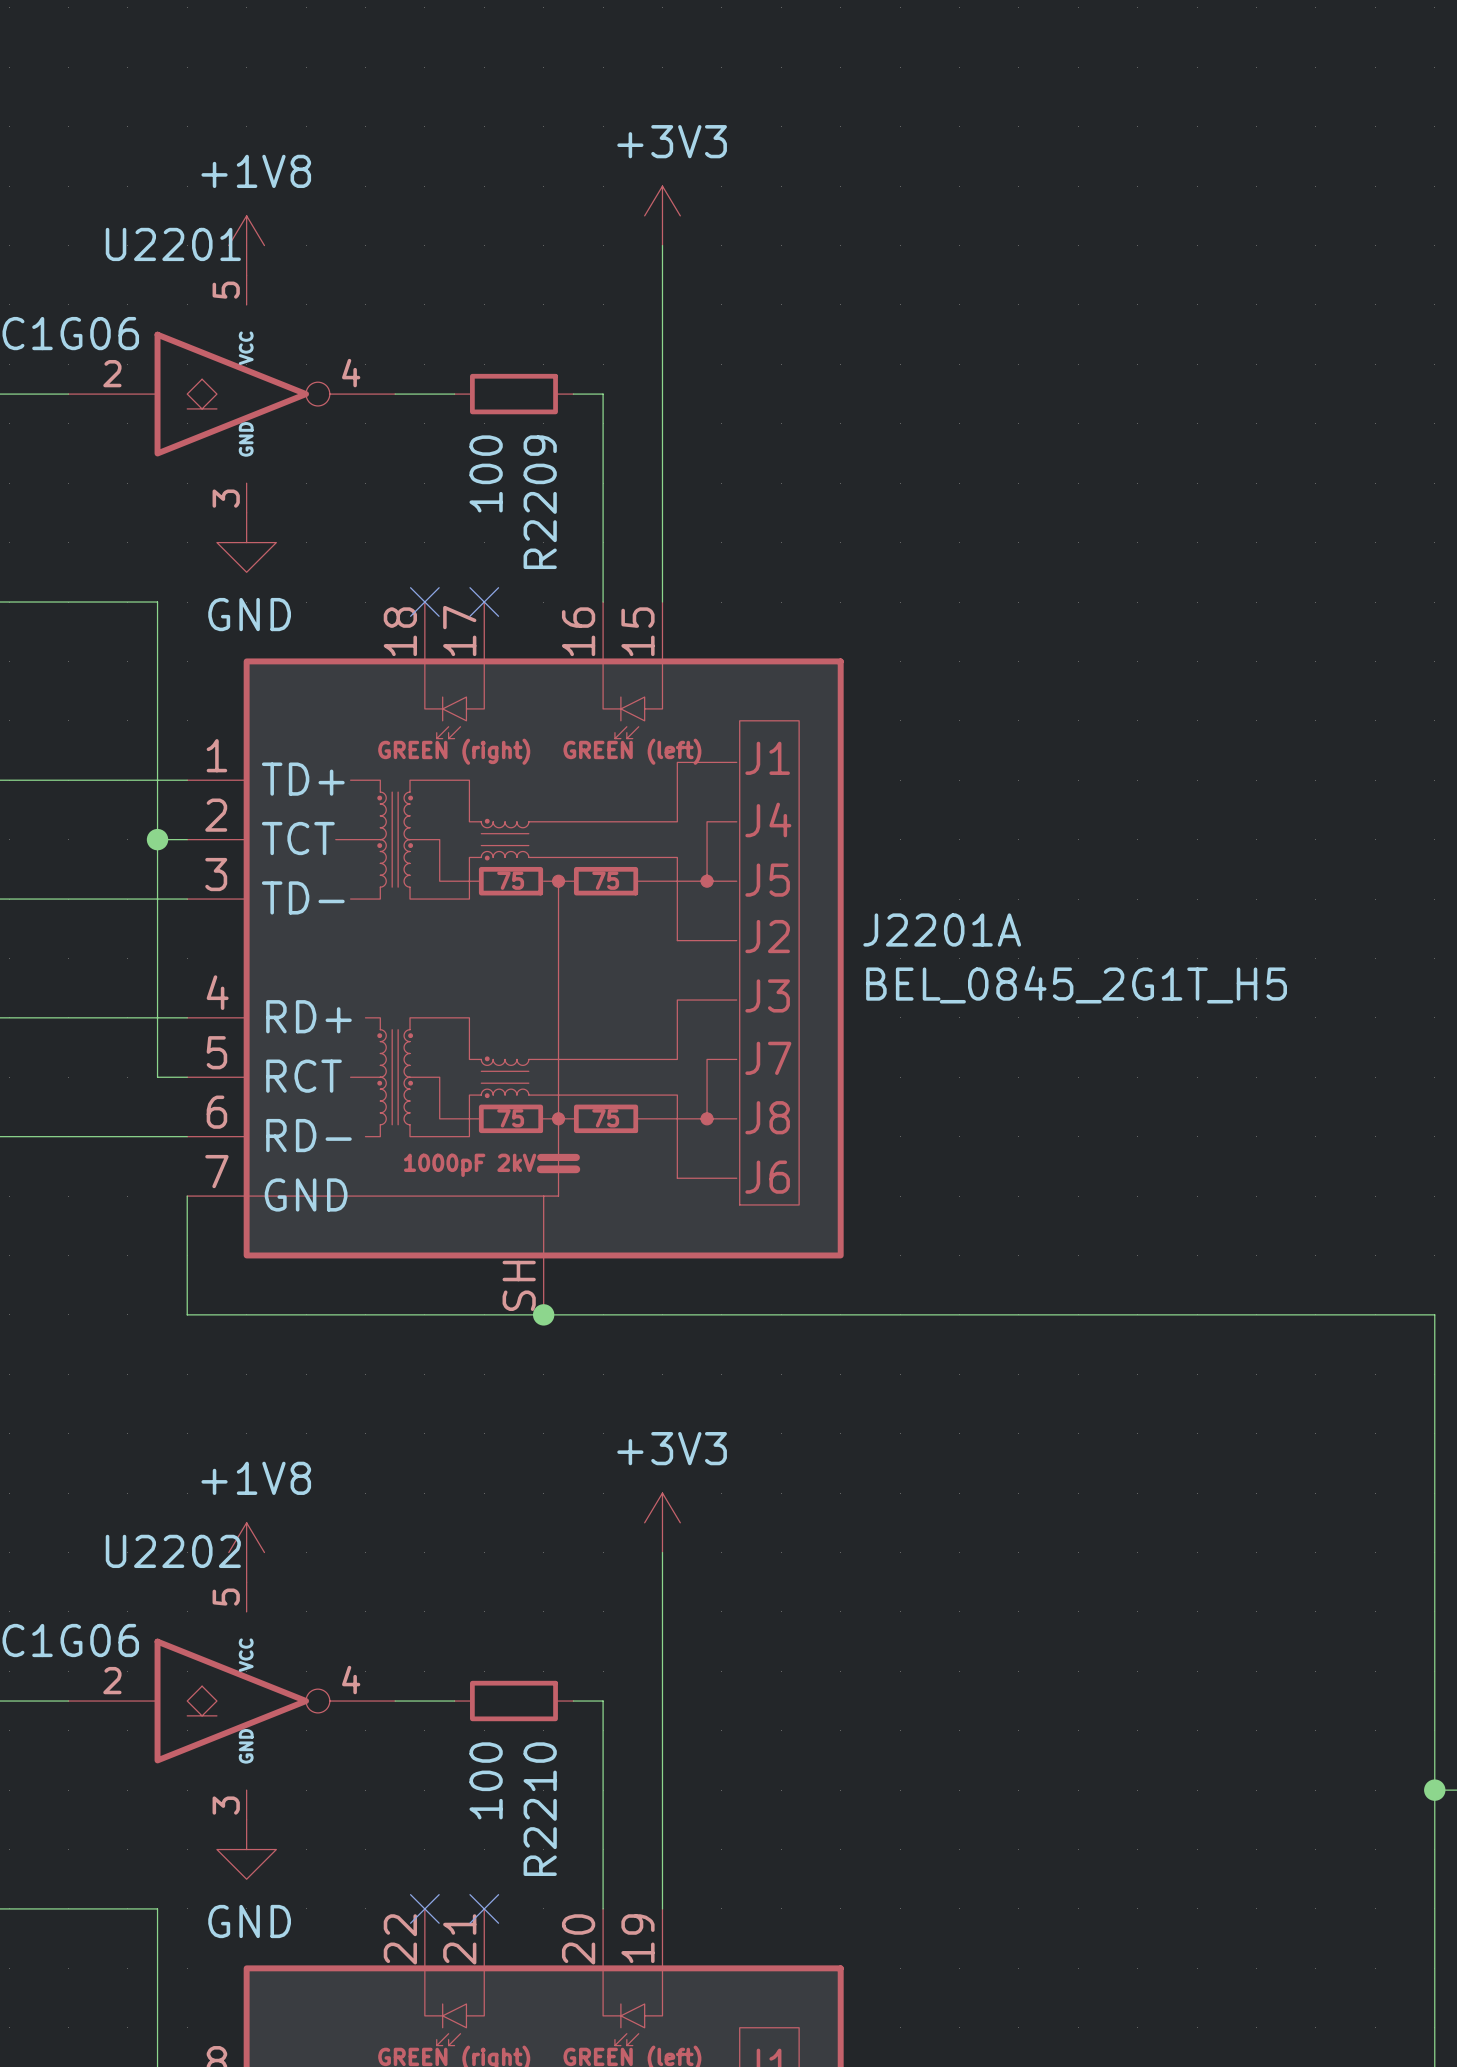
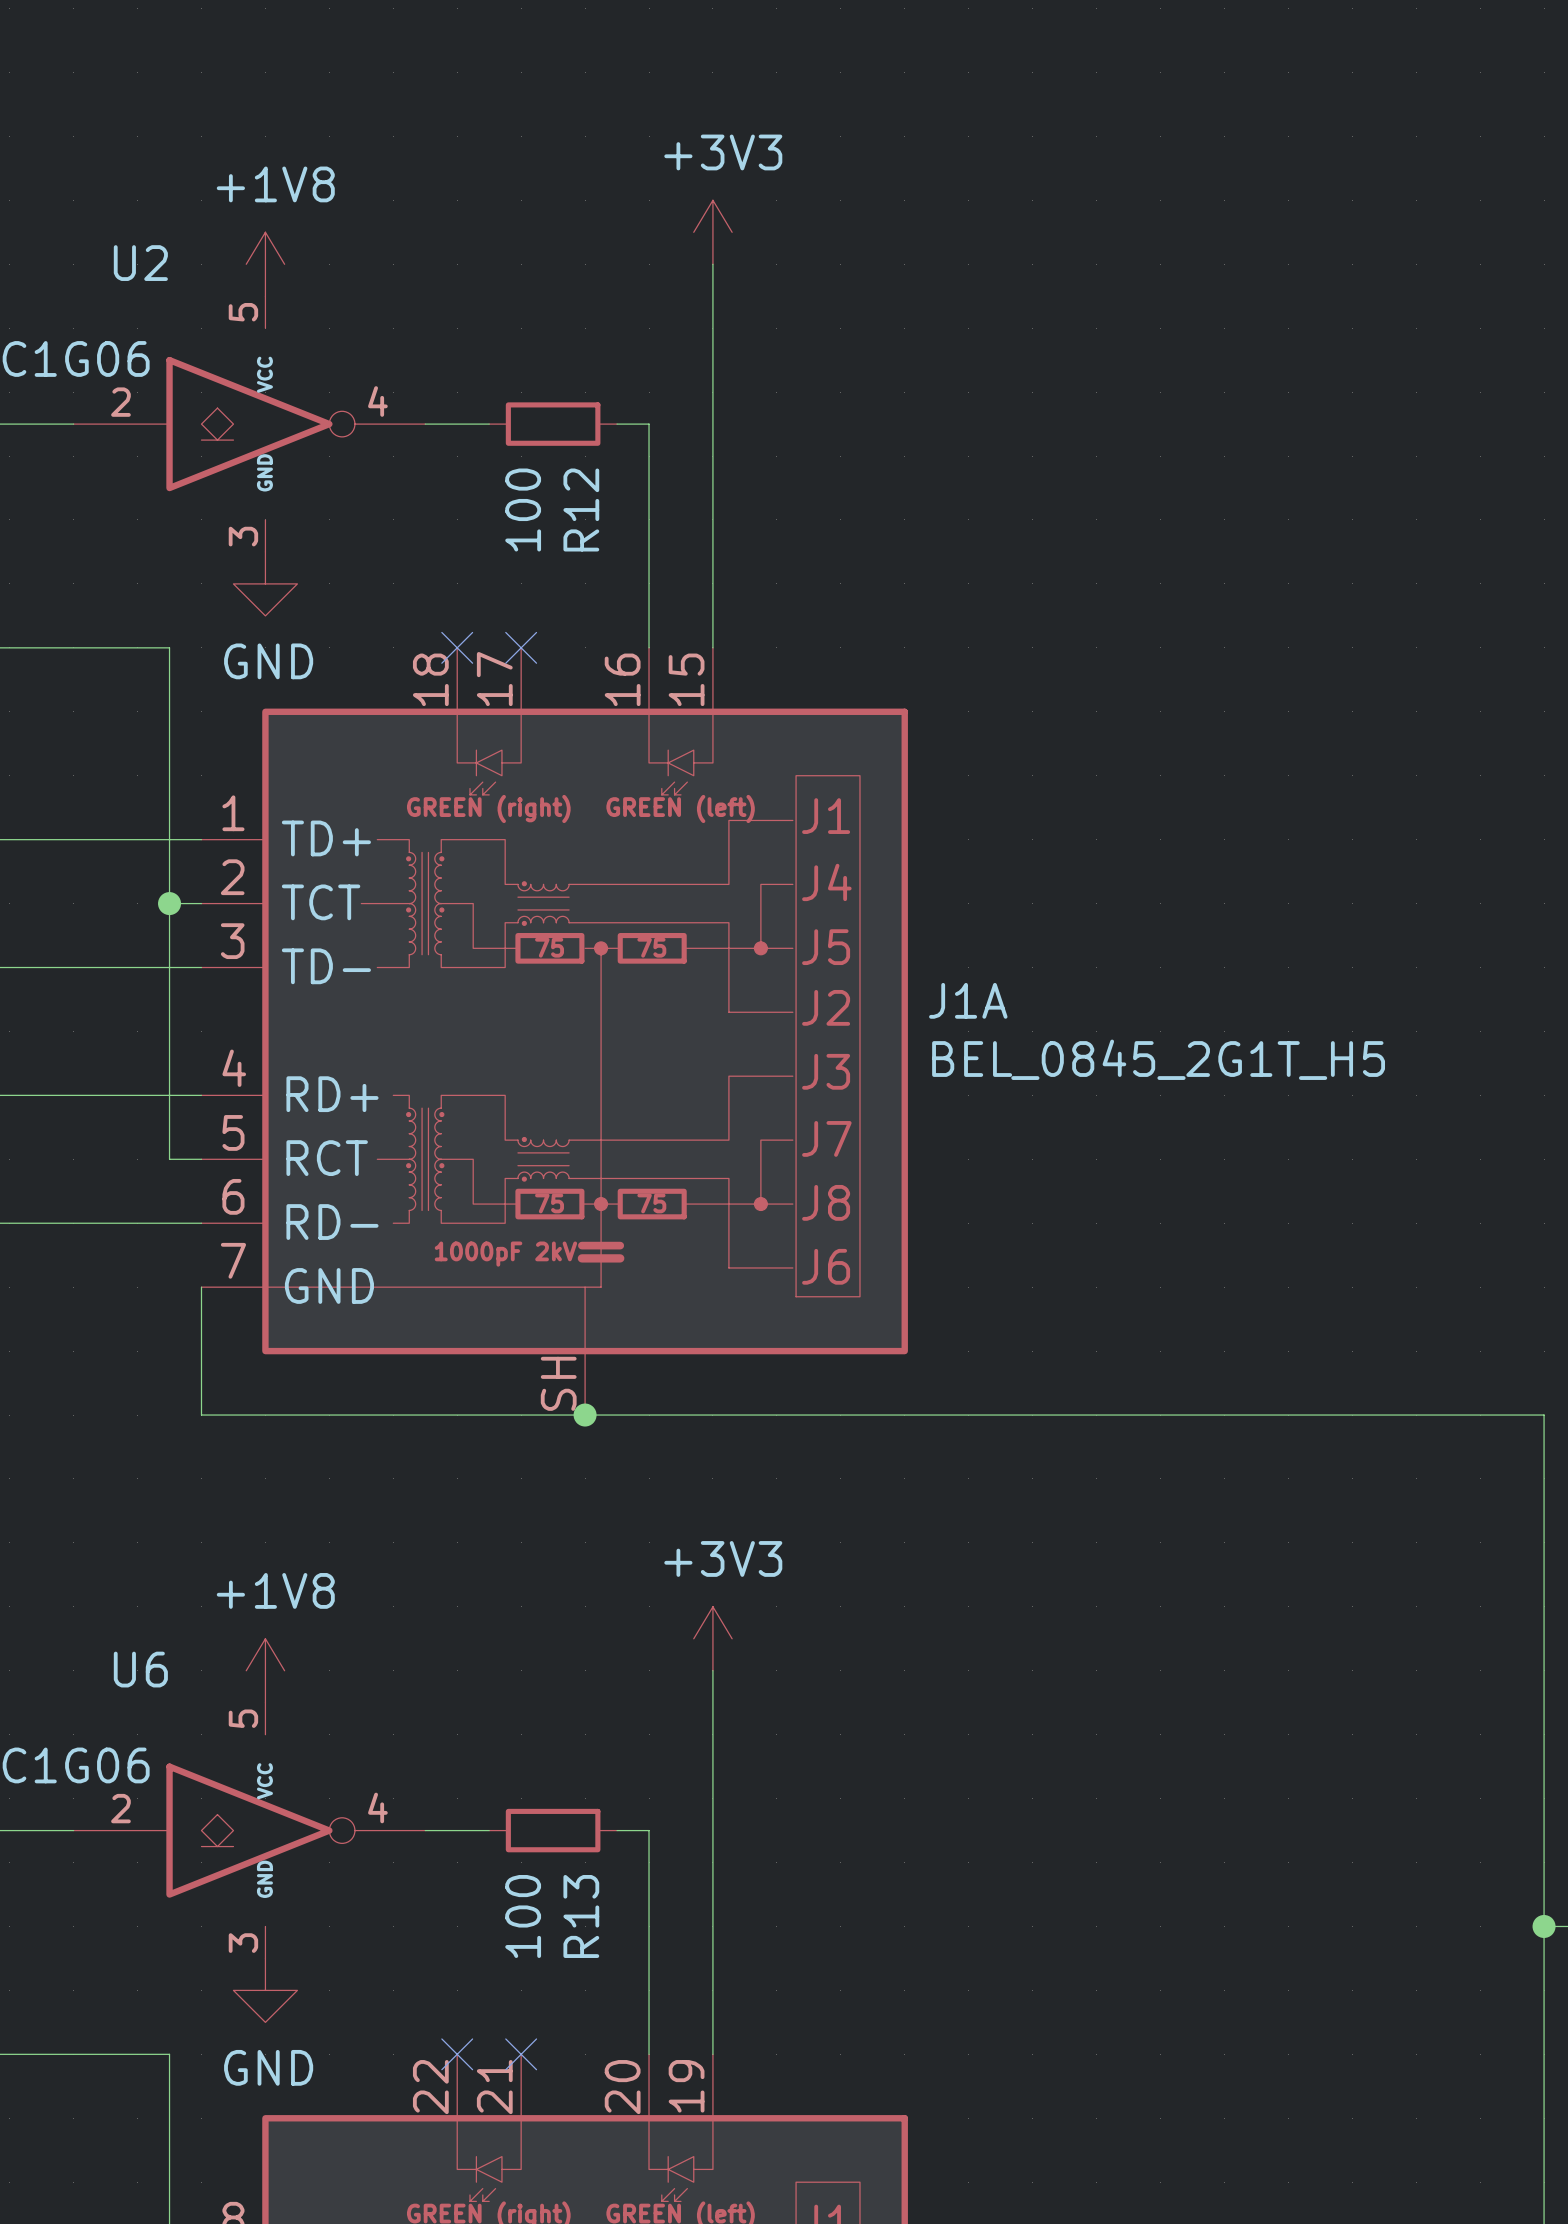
U2201 name: U2201 (173, 244) -> U2 (140, 263)
R2209 name: R2209 (540, 502) -> R12 (581, 510)
J2201A name: J2201A (942, 930) -> J1A (968, 1000)
U2202 name: U2202 (173, 1551) -> U6 (140, 1669)
R2210 name: R2210 (540, 1809) -> R13 (581, 1916)

